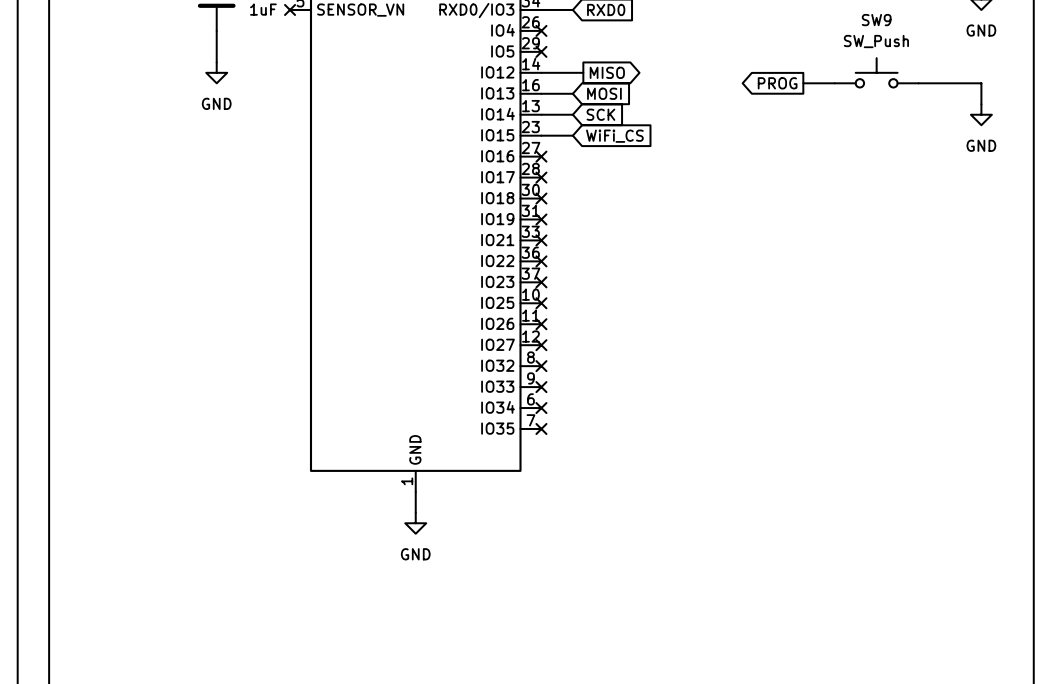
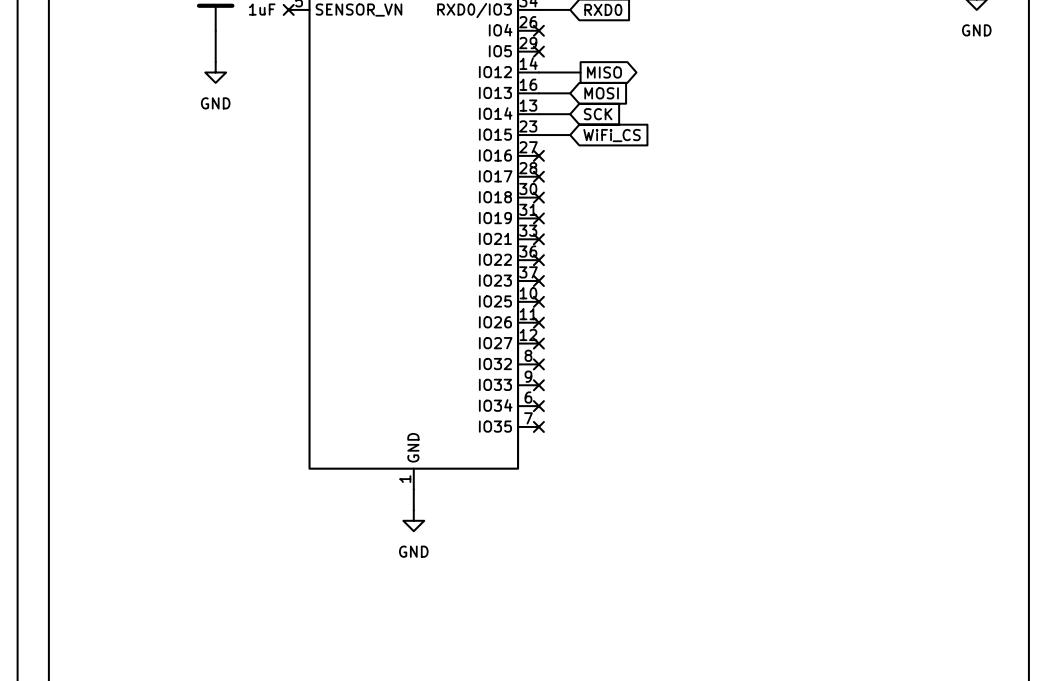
SW9: SW_Push (876, 72) -> none
global label: PROG (777, 83) -> none
wire: (803, 83) (834, 83) -> none
wire: (918, 83) (981, 83) (981, 104) -> none
power symbol: GND (981, 114) -> none

